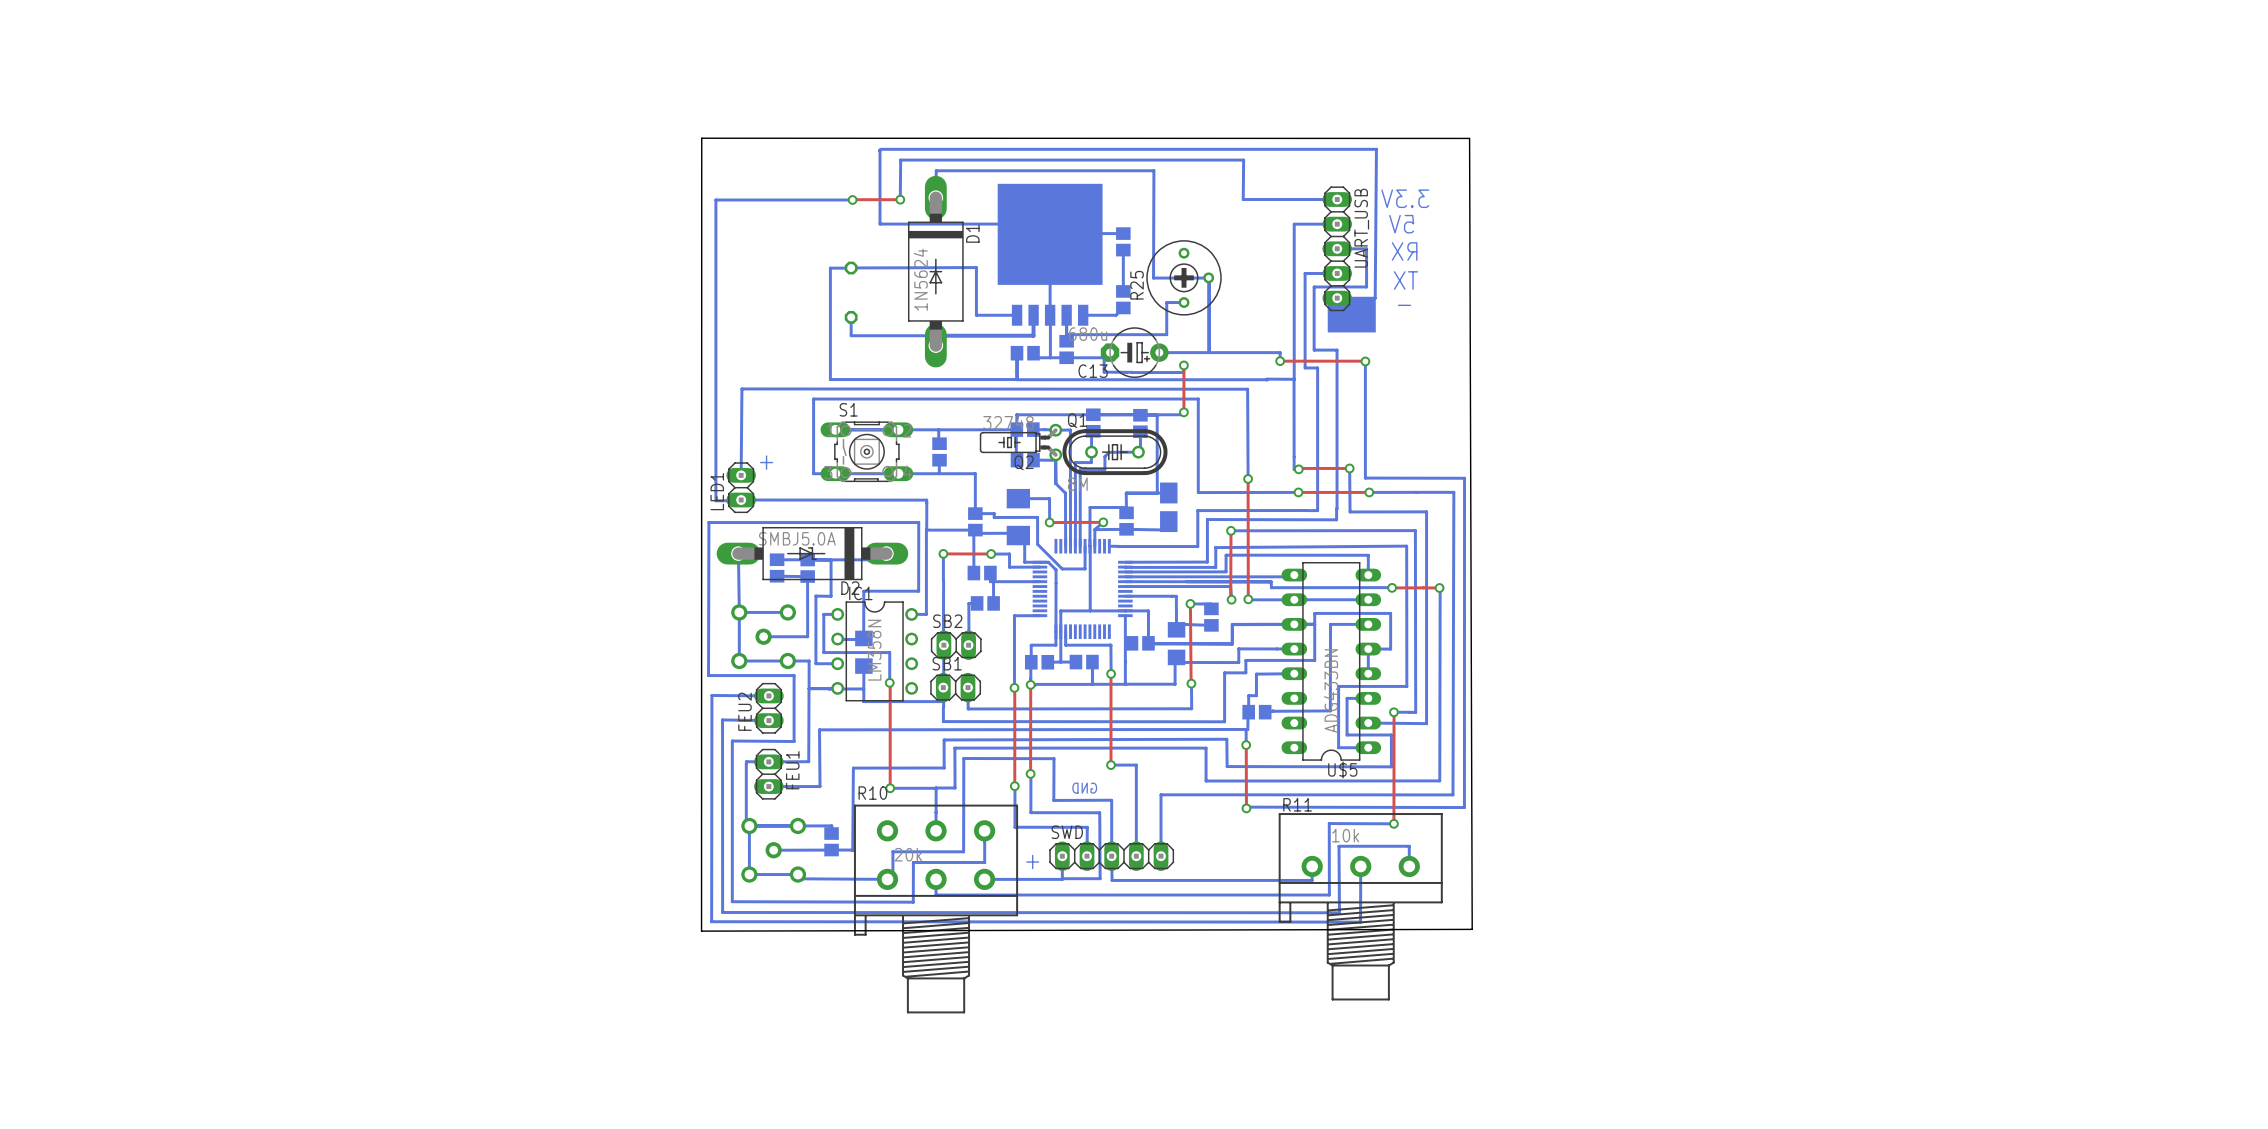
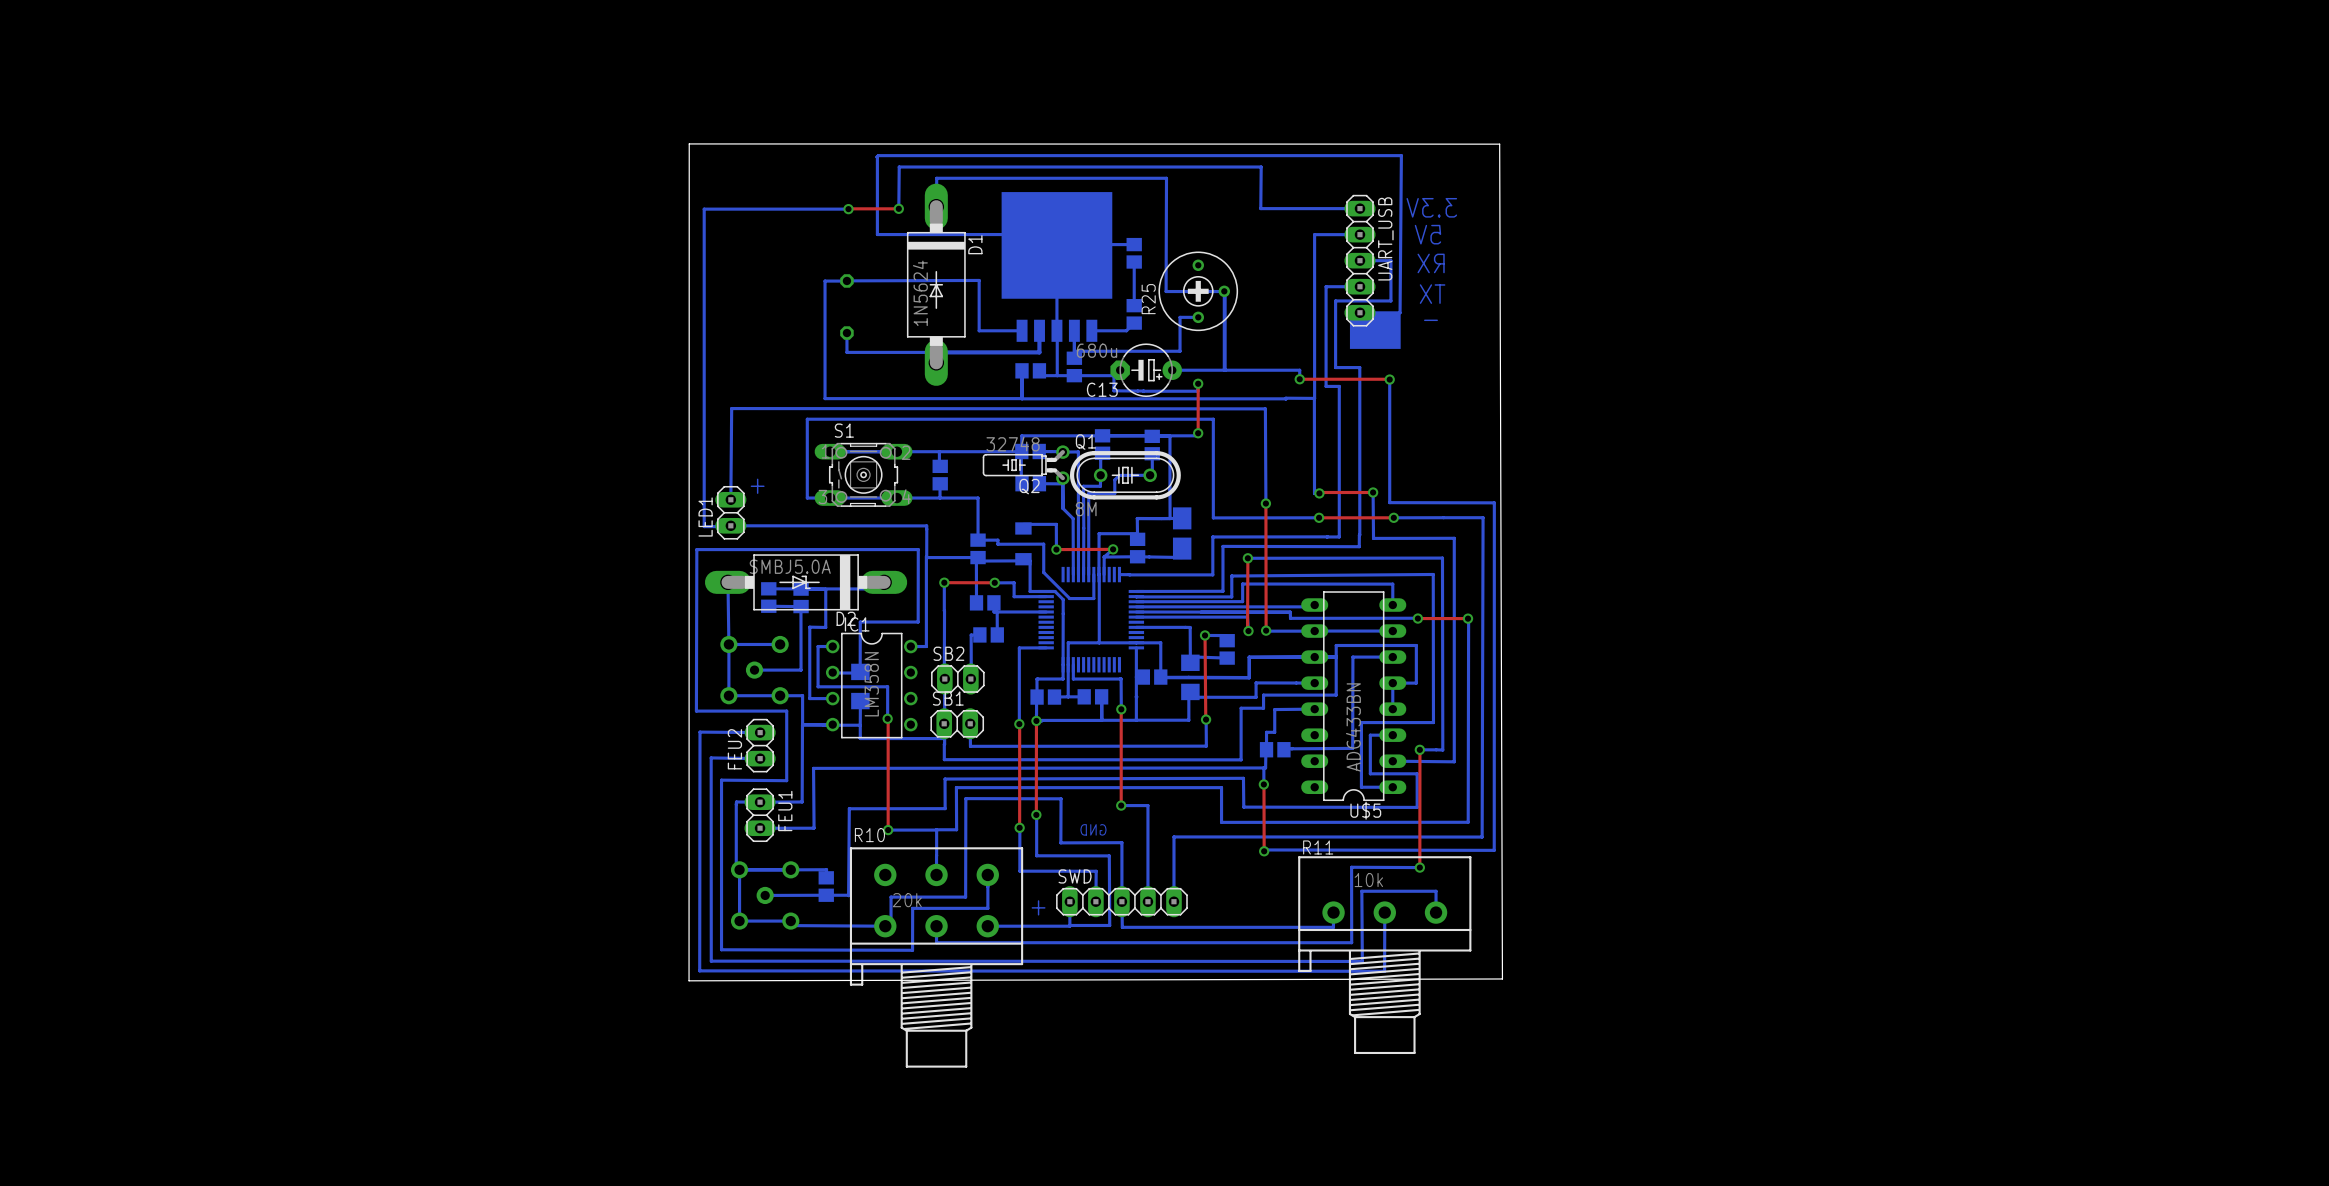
part footprint: [1006, 488, 1031, 546] -> [1015, 522, 1032, 566]

